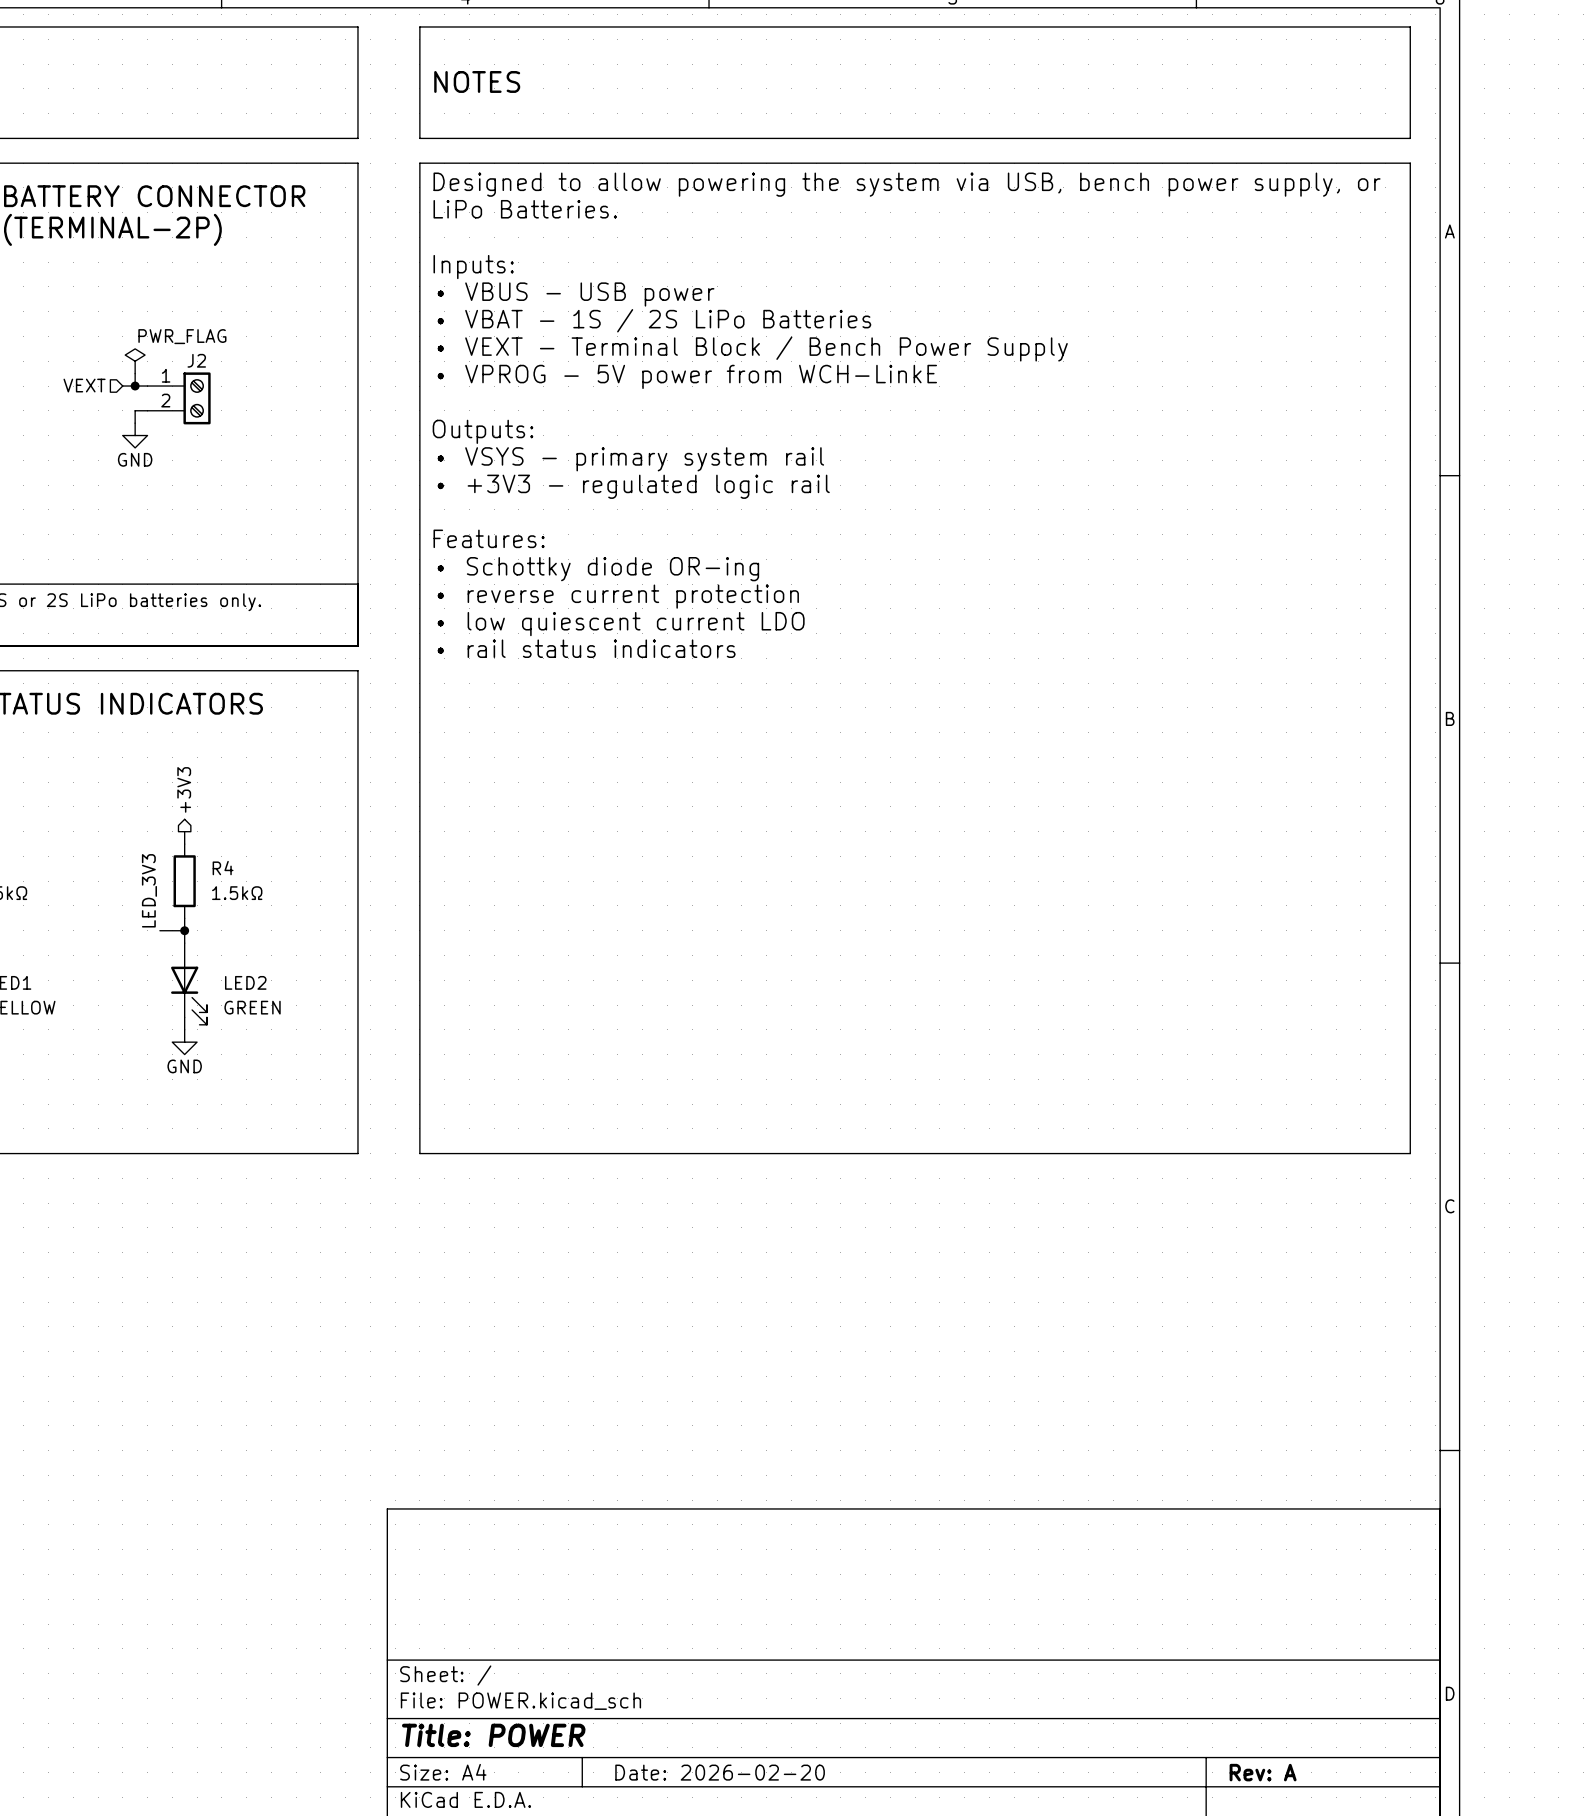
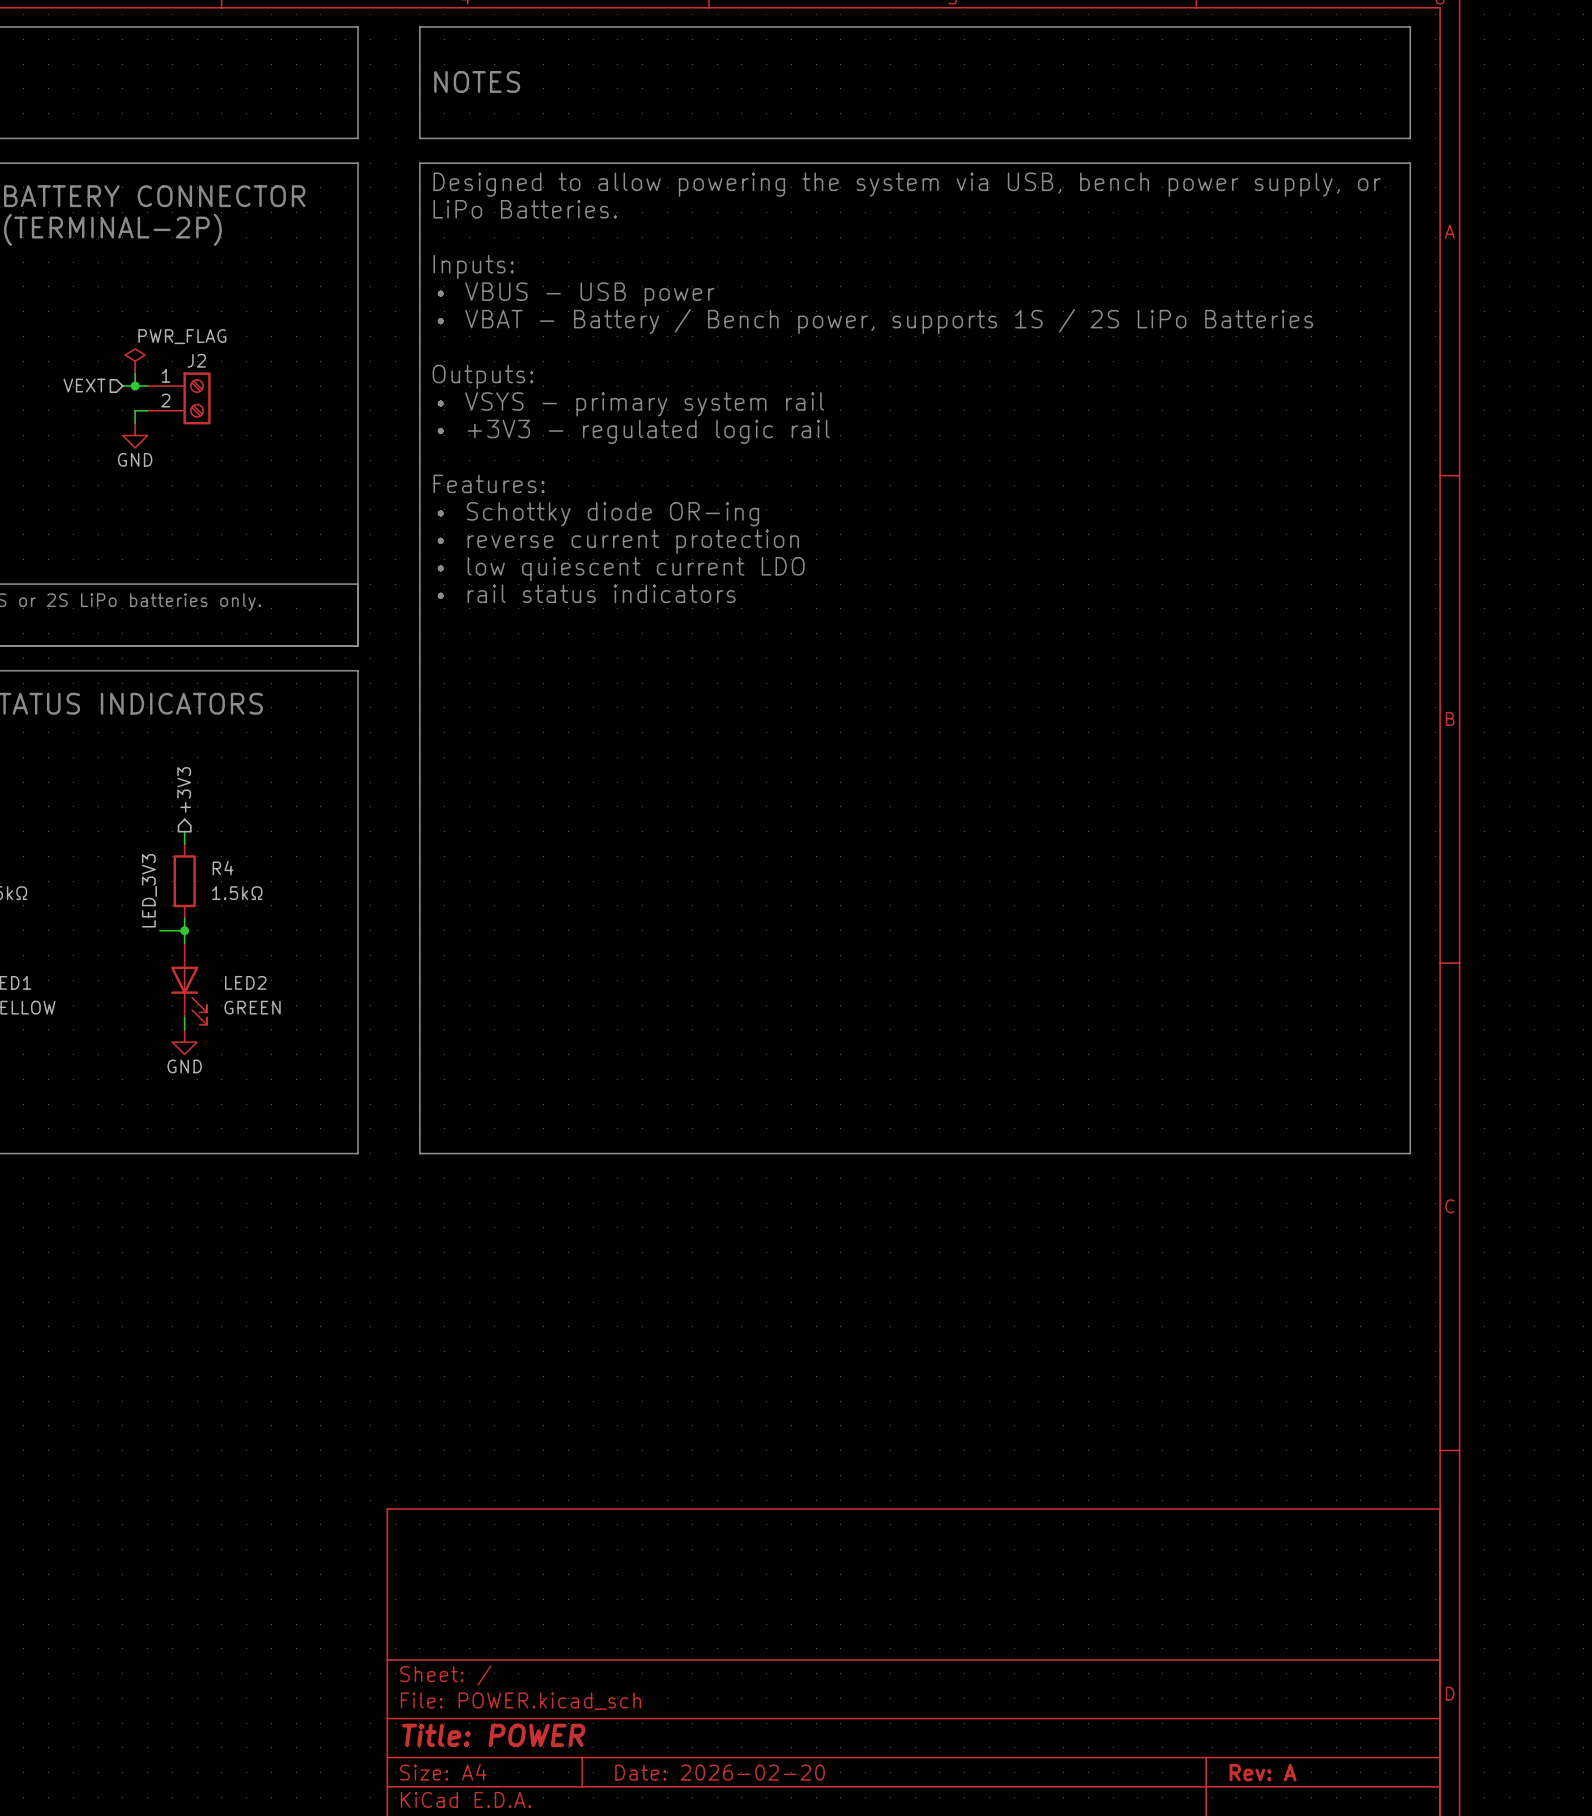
text: • VBAT - 1S / 2S LiPo Batteries (654, 320) -> • VBAT - Battery / Bench power, supports 1S / 2S LiPo Batteries (875, 321)
text: • VEXT - Terminal Block / Bench Power Supply (752, 349) -> none
text: • VPROG - 5V power from WCH-LinkE (687, 376) -> Outputs: (482, 376)
text: Outputs: (482, 431) -> • +3V3 - regulated logic rail (633, 431)
text position: • VSYS - primary system rail (630, 459) -> • VSYS - primary system rail (630, 404)
text: • +3V3 - regulated logic rail (633, 486) -> Features: (489, 483)
text: none -> • Schottky diode OR-ing (598, 514)
text: Features: (489, 538) -> • reverse current protection (618, 541)
text: • Schottky diode OR-ing (598, 569) -> • low quiescent current LDO (621, 569)
text: • reverse current protection (618, 596) -> • rail status indicators (586, 593)
text: • low quiescent current LDO (621, 624) -> none
text: • rail status indicators (586, 648) -> none

